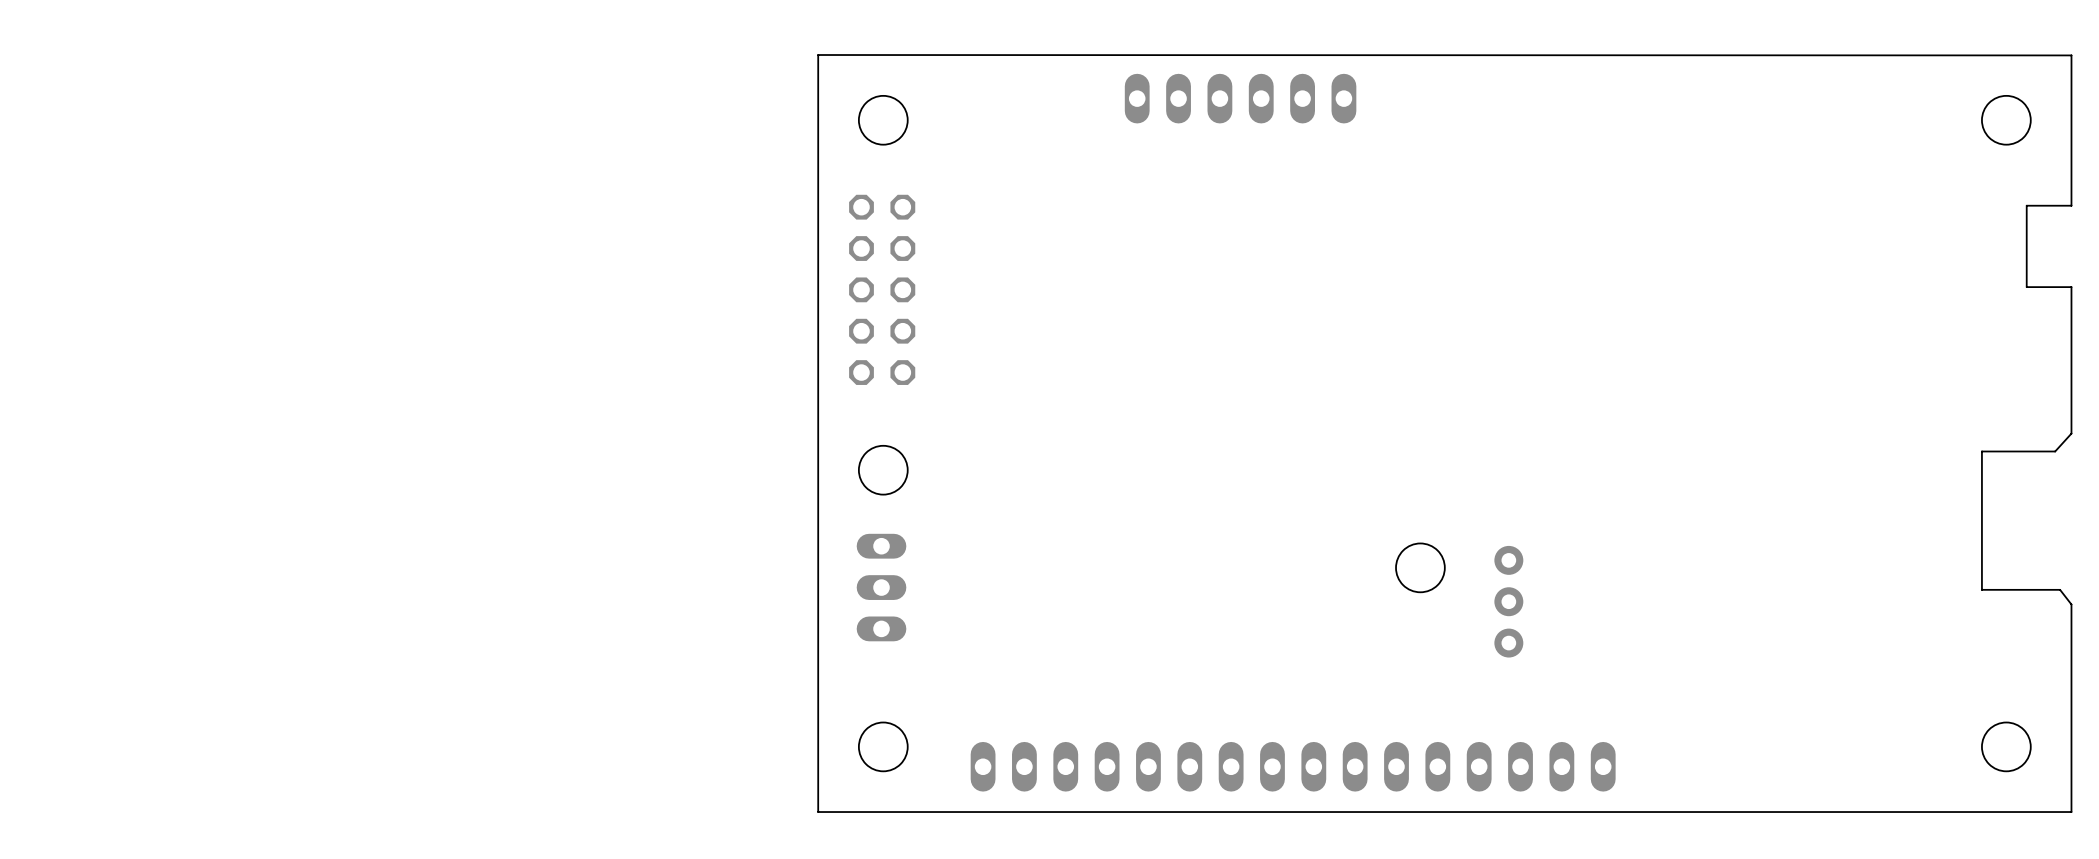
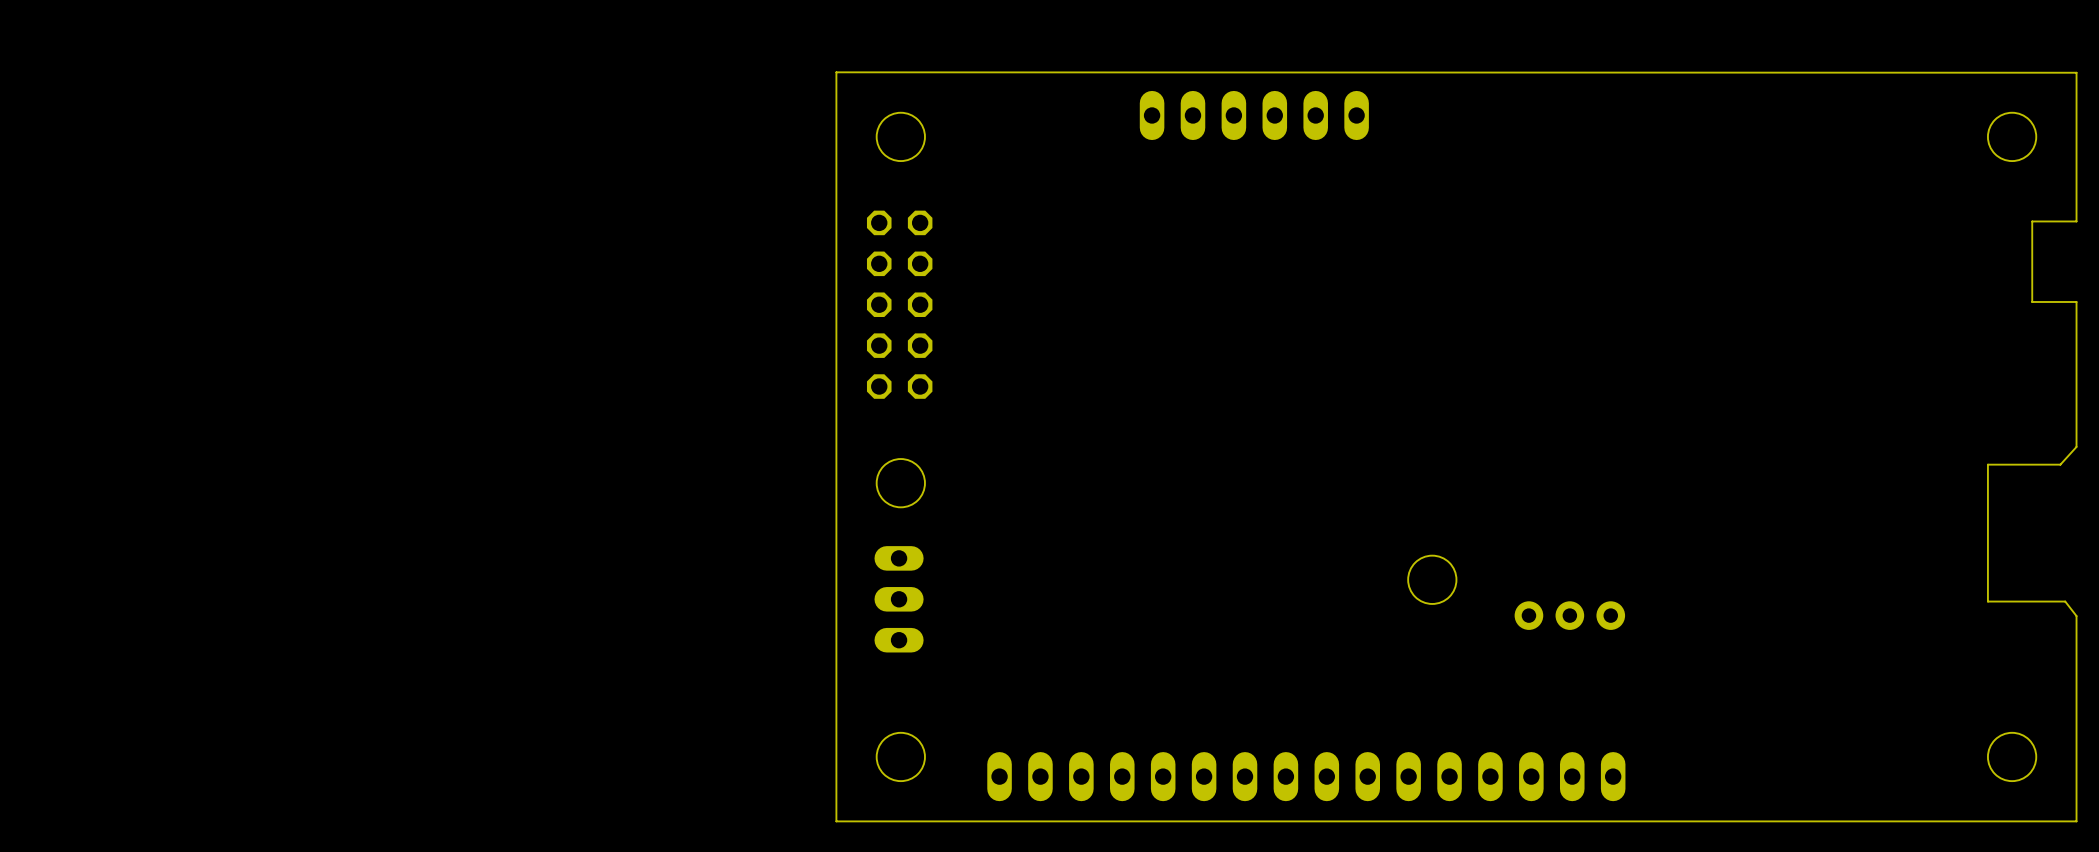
part rotation: 0° (1508, 601) -> 90° clockwise (1569, 615)

